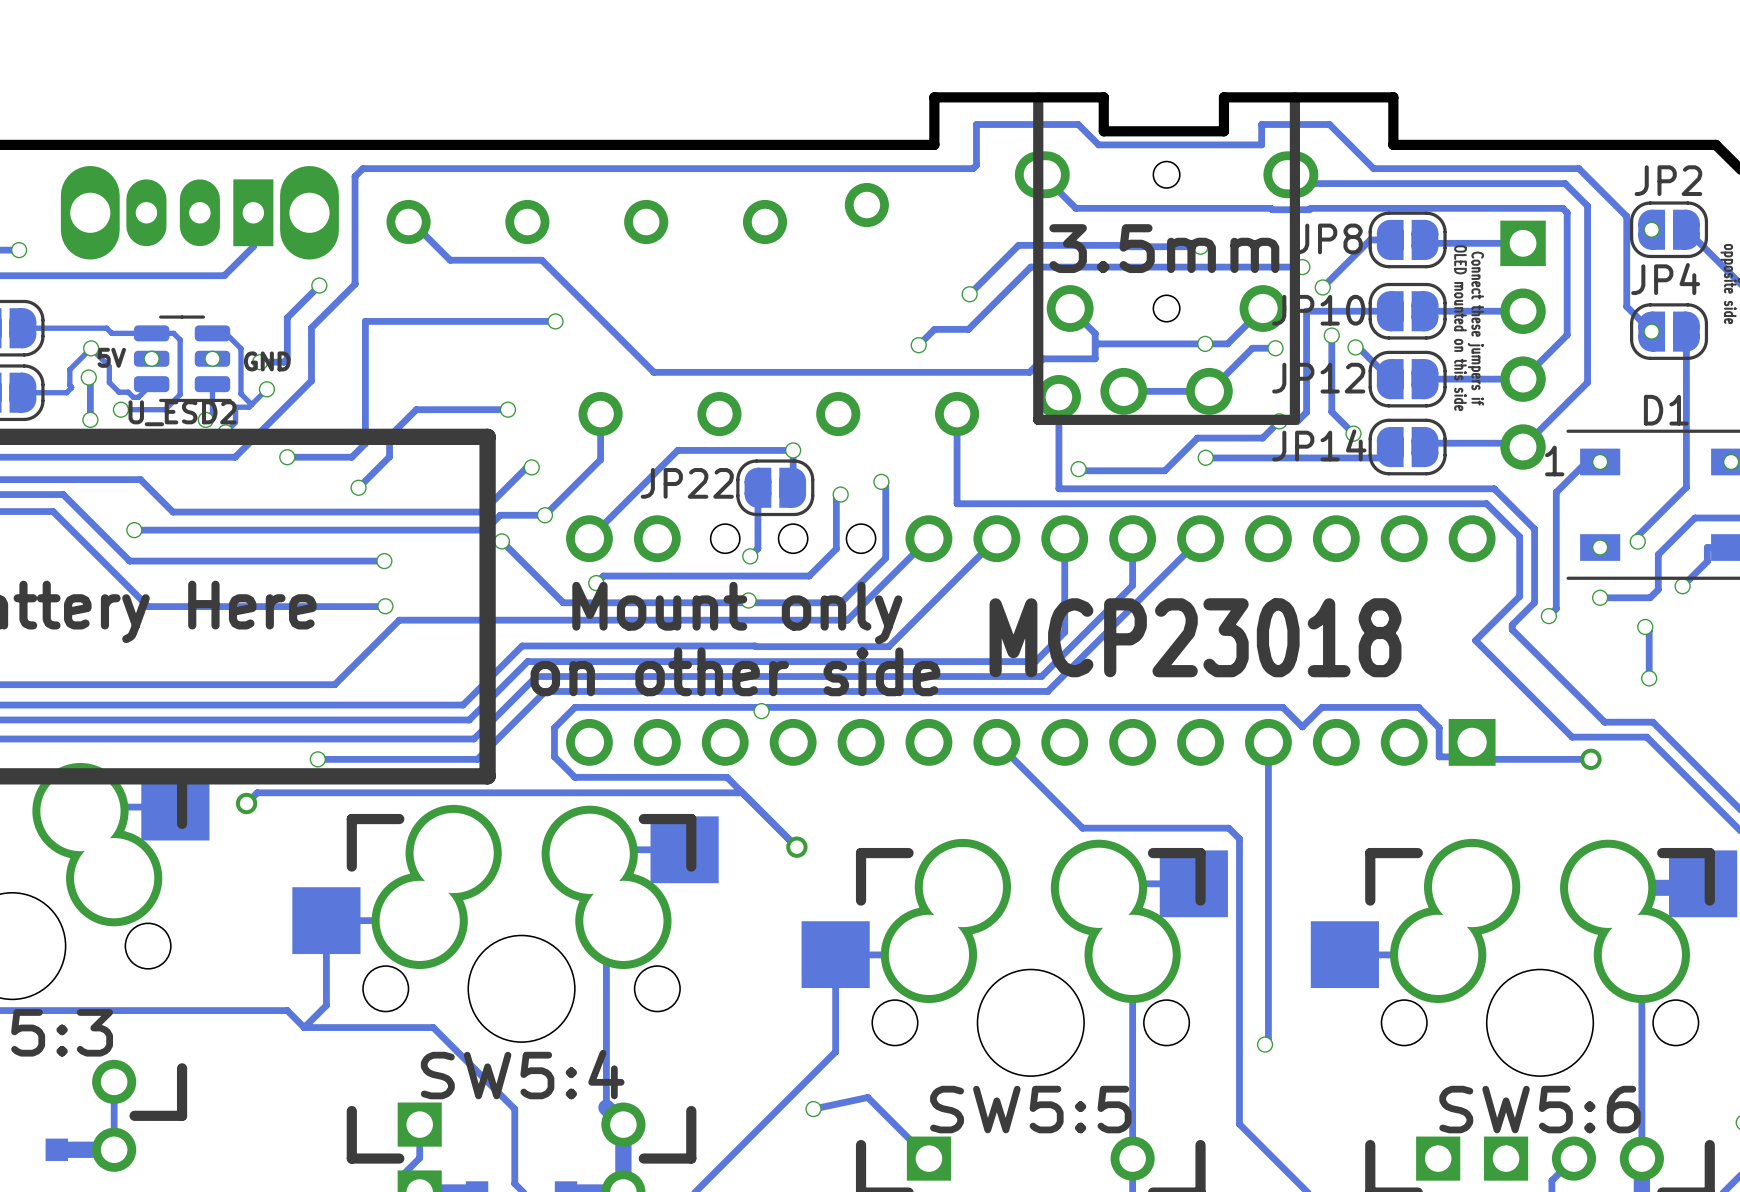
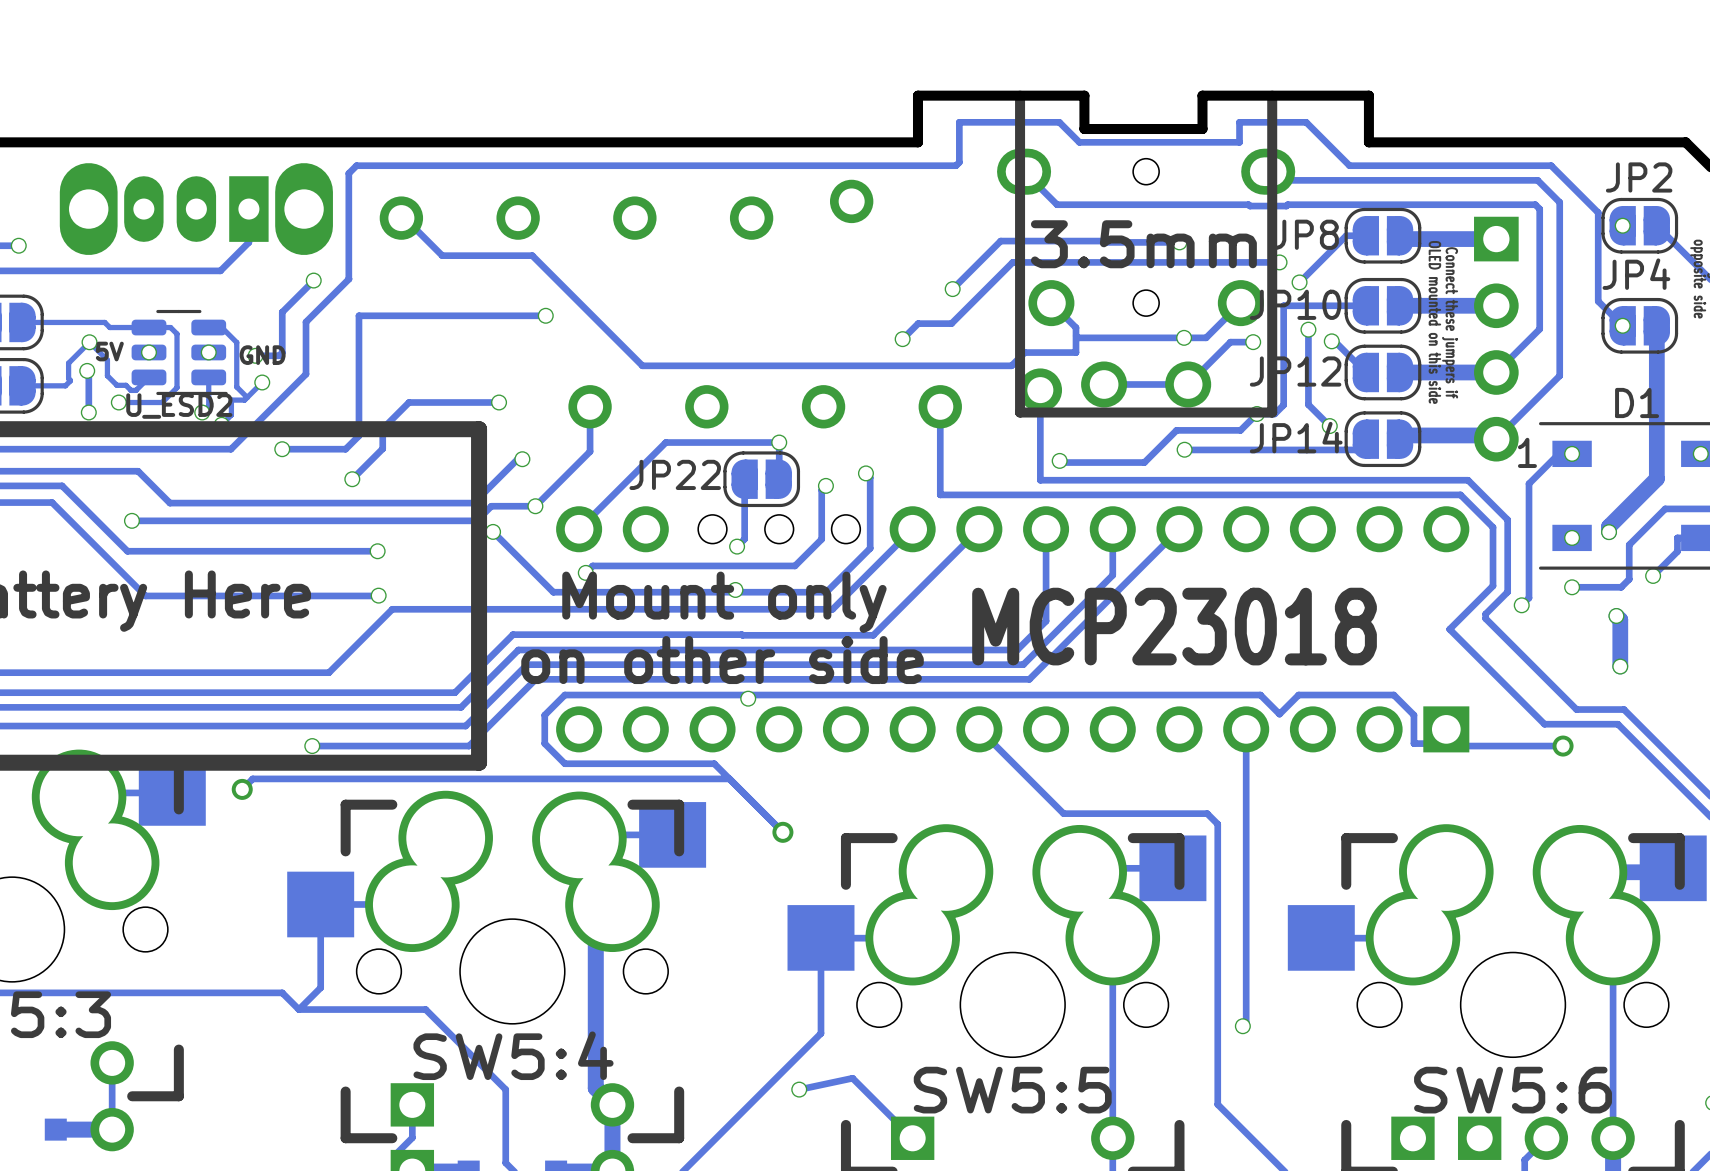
track width: thin (1523, 243) (1428, 243) -> thick (1496, 239) (1403, 239)
track width: thin (1523, 311) (1425, 311) -> thick (1496, 305) (1400, 305)
track width: thin (1686, 331) (1686, 487) (1637, 536) (1637, 541) -> thick (1656, 325) (1656, 478) (1609, 526) (1609, 532)
track width: thin (1523, 379) (1425, 379) -> thick (1496, 372) (1400, 372)
track width: thin (1519, 443) (1425, 443) -> thick (1492, 435) (1400, 435)
track width: thin (1645, 626) (1649, 630) (1649, 678) -> thick (1616, 615) (1620, 619) (1620, 666)
track width: thin (606, 937) (606, 1107) -> thick (595, 921) (595, 1088)

